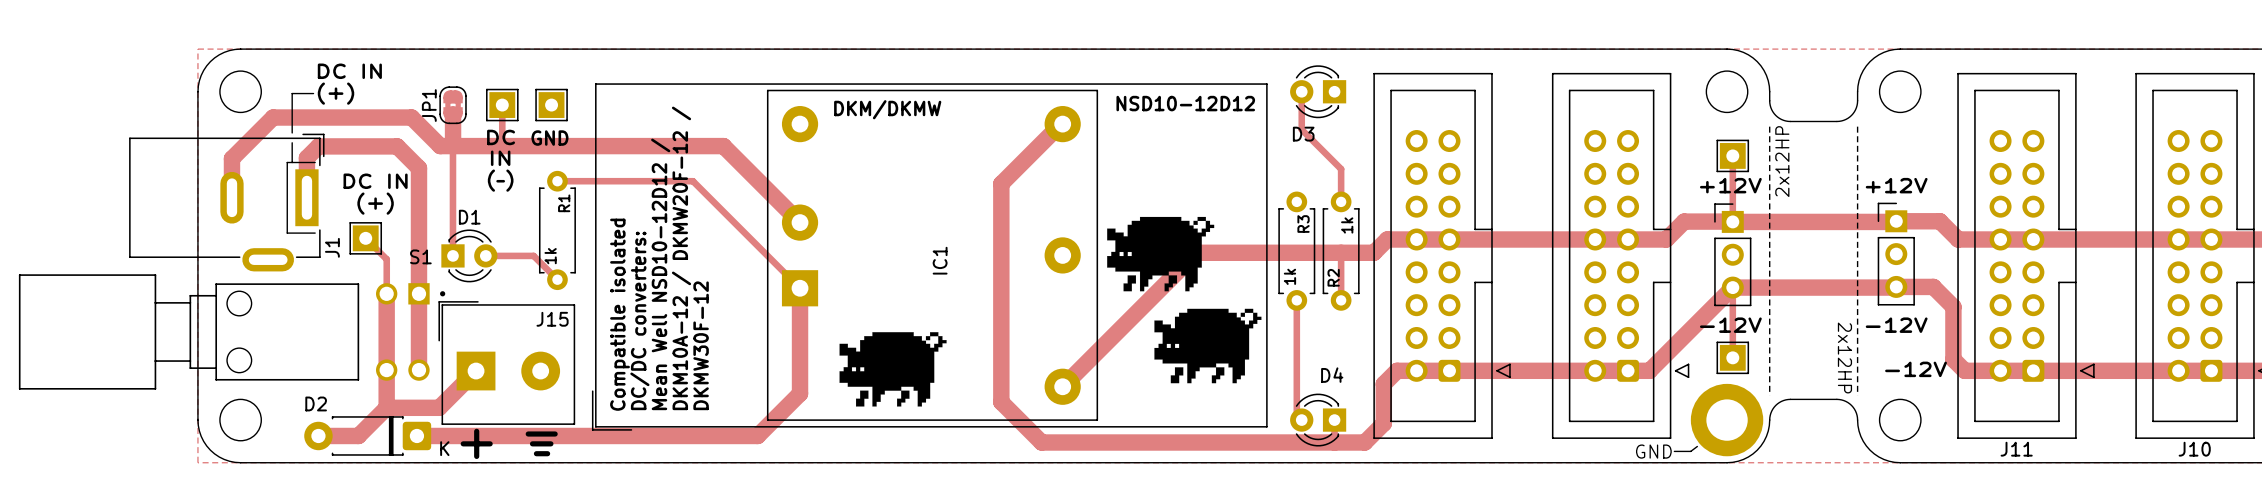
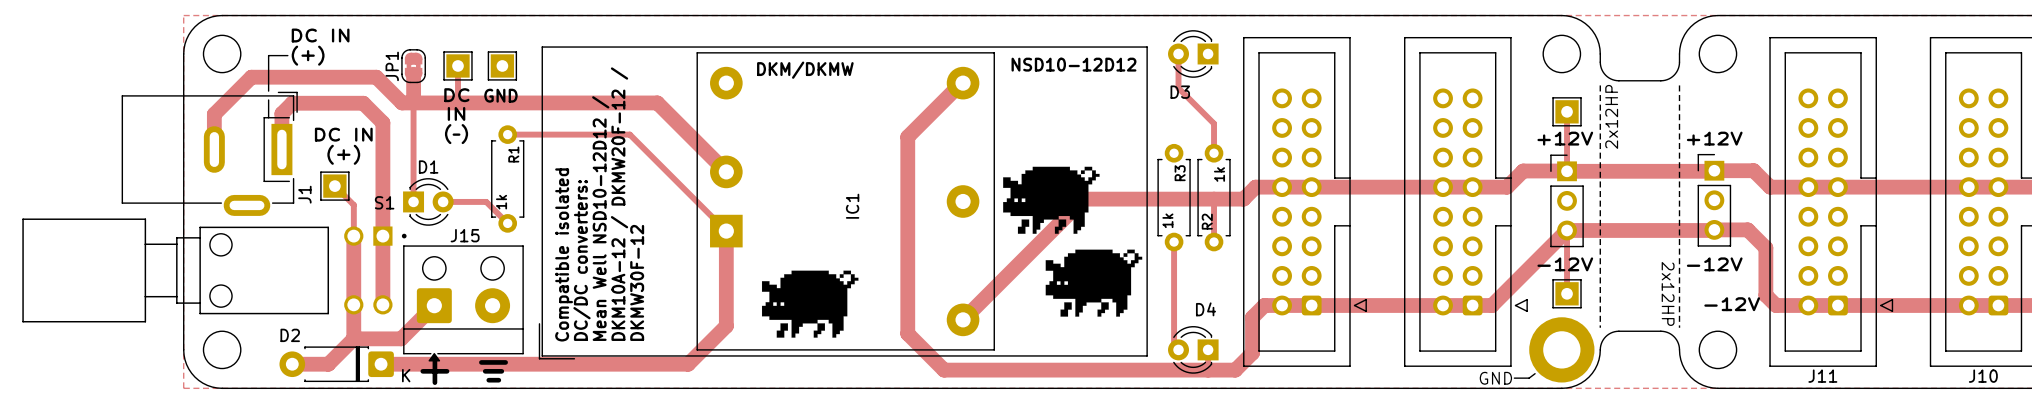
J15 footprint: [438, 301, 576, 425] -> [403, 245, 524, 362]
J15 name position: J15 (552, 319) -> J15 (465, 235)

